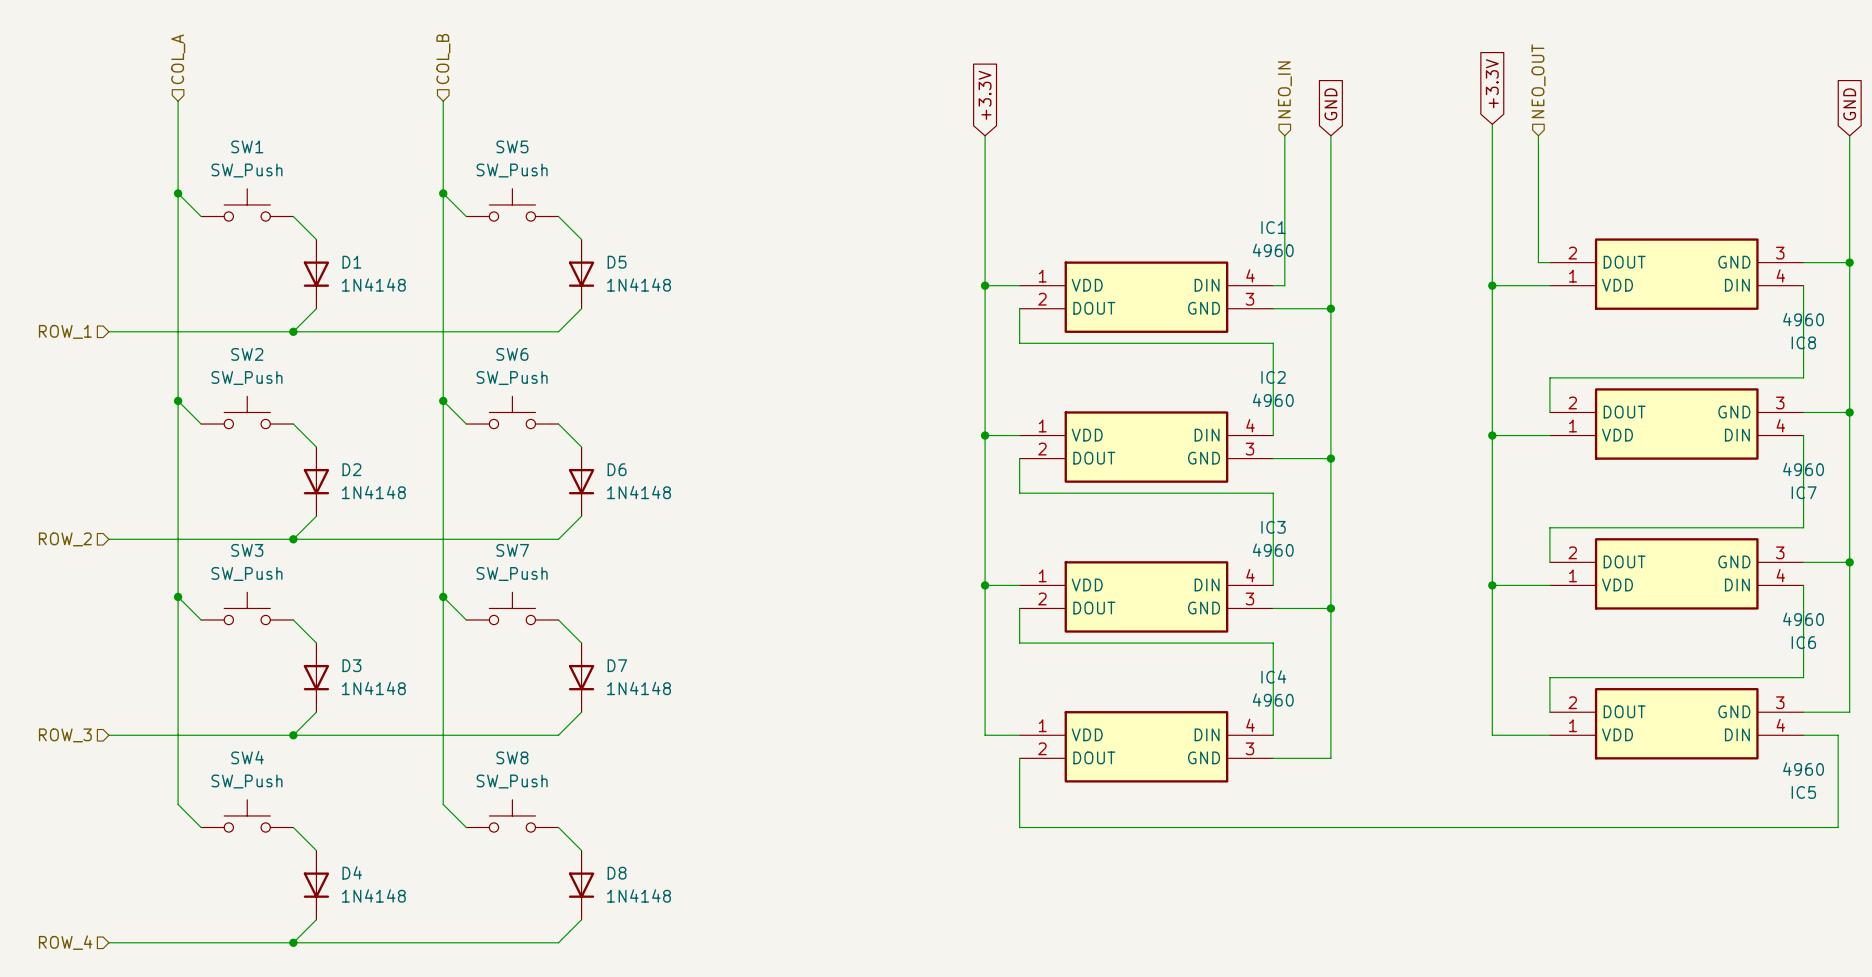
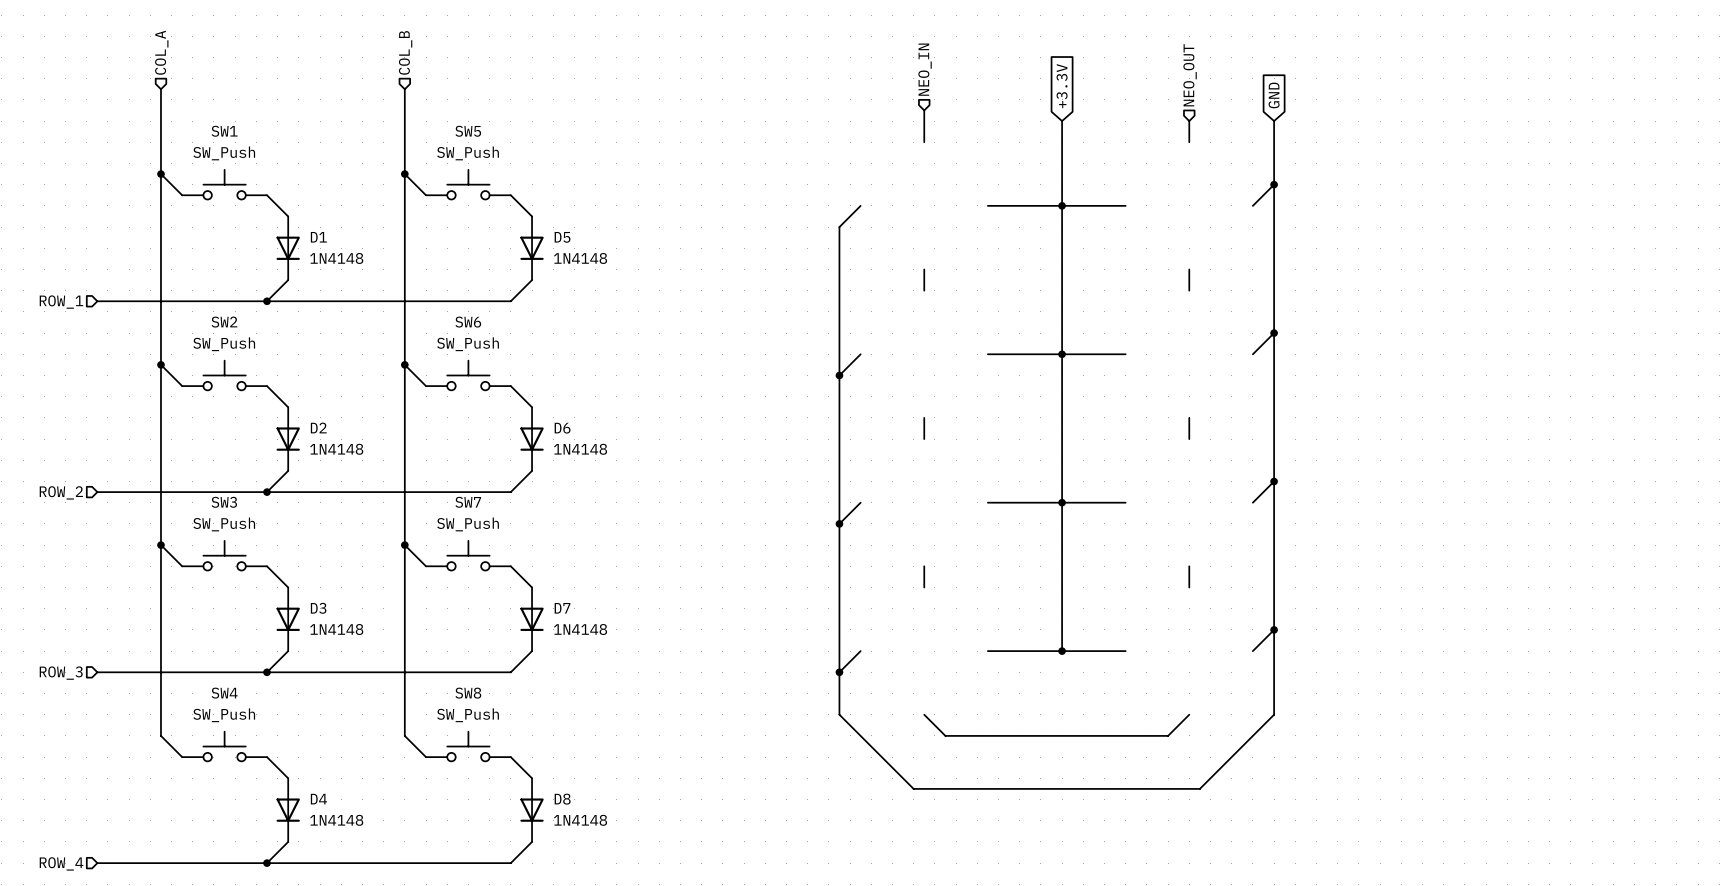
hierarchical label: none -> NEO_IN (925, 69)
hierarchical label: NEO_OUT (1538, 81) -> none
global label: +3.3V (1492, 83) -> none
hierarchical label: NEO_IN (1284, 89) -> NEO_OUT (1190, 75)
global label: +3.3V (985, 95) -> none
global label: none -> +3.3V (1062, 86)
global label position: GND (1330, 104) -> GND (1274, 95)
global label: GND (1849, 104) -> none
wire: none -> (924, 110) (924, 142)
wire: (1492, 124) (1492, 735) (1549, 735) -> none
wire: (985, 135) (985, 735) (1019, 735) -> none
wire: none -> (1062, 121) (1062, 651)
wire: (1284, 135) (1284, 285) (1273, 285) -> none
wire: none -> (1189, 121) (1189, 142)
wire: (1330, 135) (1330, 758) (1273, 758) -> none
wire: none -> (1274, 121) (1274, 714) (1199, 788) (913, 788) (839, 714) (839, 227) (860, 205)
wire: (1538, 135) (1538, 262) (1549, 262) -> none
wire: (1849, 135) (1849, 712) (1803, 712) -> none
wire: none -> (1274, 184) (1252, 205)
junction: none -> (1274, 184)
wire: none -> (987, 205) (1125, 205)
junction: none -> (1062, 205)
wire: (1803, 262) (1849, 262) -> none
junction: (1849, 262) -> none
IC8: 4960 (1676, 274) -> none
wire: (985, 285) (1019, 285) -> none
junction: (985, 285) -> none
wire: (1492, 285) (1549, 285) -> none
junction: (1492, 285) -> none
wire: (1803, 285) (1803, 377) (1549, 377) (1549, 412) -> none
wire: none -> (924, 269) (924, 290)
IC1: 4960 (1146, 297) -> none
wire: none -> (1189, 269) (1189, 290)
wire: (1019, 308) (1019, 343) (1273, 343) (1273, 435) -> none
wire: (1273, 308) (1330, 308) -> none
junction: (1330, 308) -> none
wire: none -> (1274, 333) (1252, 354)
junction: none -> (1274, 333)
wire: none -> (860, 354) (839, 375)
wire: none -> (987, 354) (1125, 354)
junction: none -> (1062, 354)
junction: none -> (839, 375)
wire: (1803, 412) (1849, 412) -> none
junction: (1849, 412) -> none
IC7: 4960 (1676, 424) -> none
wire: (985, 435) (1019, 435) -> none
junction: (985, 435) -> none
wire: (1492, 435) (1549, 435) -> none
junction: (1492, 435) -> none
wire: (1803, 435) (1803, 527) (1549, 527) (1549, 562) -> none
IC2: 4960 (1146, 447) -> none
wire: none -> (924, 417) (924, 439)
wire: (1019, 458) (1019, 493) (1273, 493) (1273, 585) -> none
wire: (1273, 458) (1330, 458) -> none
wire: none -> (1189, 417) (1189, 439)
junction: (1330, 458) -> none
wire: none -> (1274, 481) (1252, 502)
junction: none -> (1274, 481)
wire: none -> (860, 502) (839, 523)
wire: none -> (987, 502) (1125, 502)
junction: none -> (1062, 502)
wire: (1803, 562) (1849, 562) -> none
junction: (1849, 562) -> none
junction: none -> (839, 523)
IC6: 4960 (1676, 573) -> none
wire: (985, 585) (1019, 585) -> none
junction: (985, 585) -> none
wire: (1492, 585) (1549, 585) -> none
junction: (1492, 585) -> none
wire: (1803, 585) (1803, 677) (1549, 677) (1549, 712) -> none
IC3: 4960 (1146, 596) -> none
wire: (1019, 608) (1019, 643) (1273, 643) (1273, 735) -> none
wire: (1273, 608) (1330, 608) -> none
junction: (1330, 608) -> none
wire: none -> (924, 566) (924, 587)
wire: none -> (1189, 566) (1189, 587)
wire: none -> (1274, 629) (1252, 651)
junction: none -> (1274, 629)
wire: none -> (860, 651) (839, 672)
junction: none -> (1062, 651)
IC5: 4960 (1676, 723) -> none
junction: none -> (839, 672)
wire: (1803, 735) (1838, 735) (1838, 827) (1019, 827) (1019, 758) -> none
IC4: 4960 (1146, 746) -> none
wire: none -> (924, 714) (945, 735) (1168, 735) (1189, 714)

